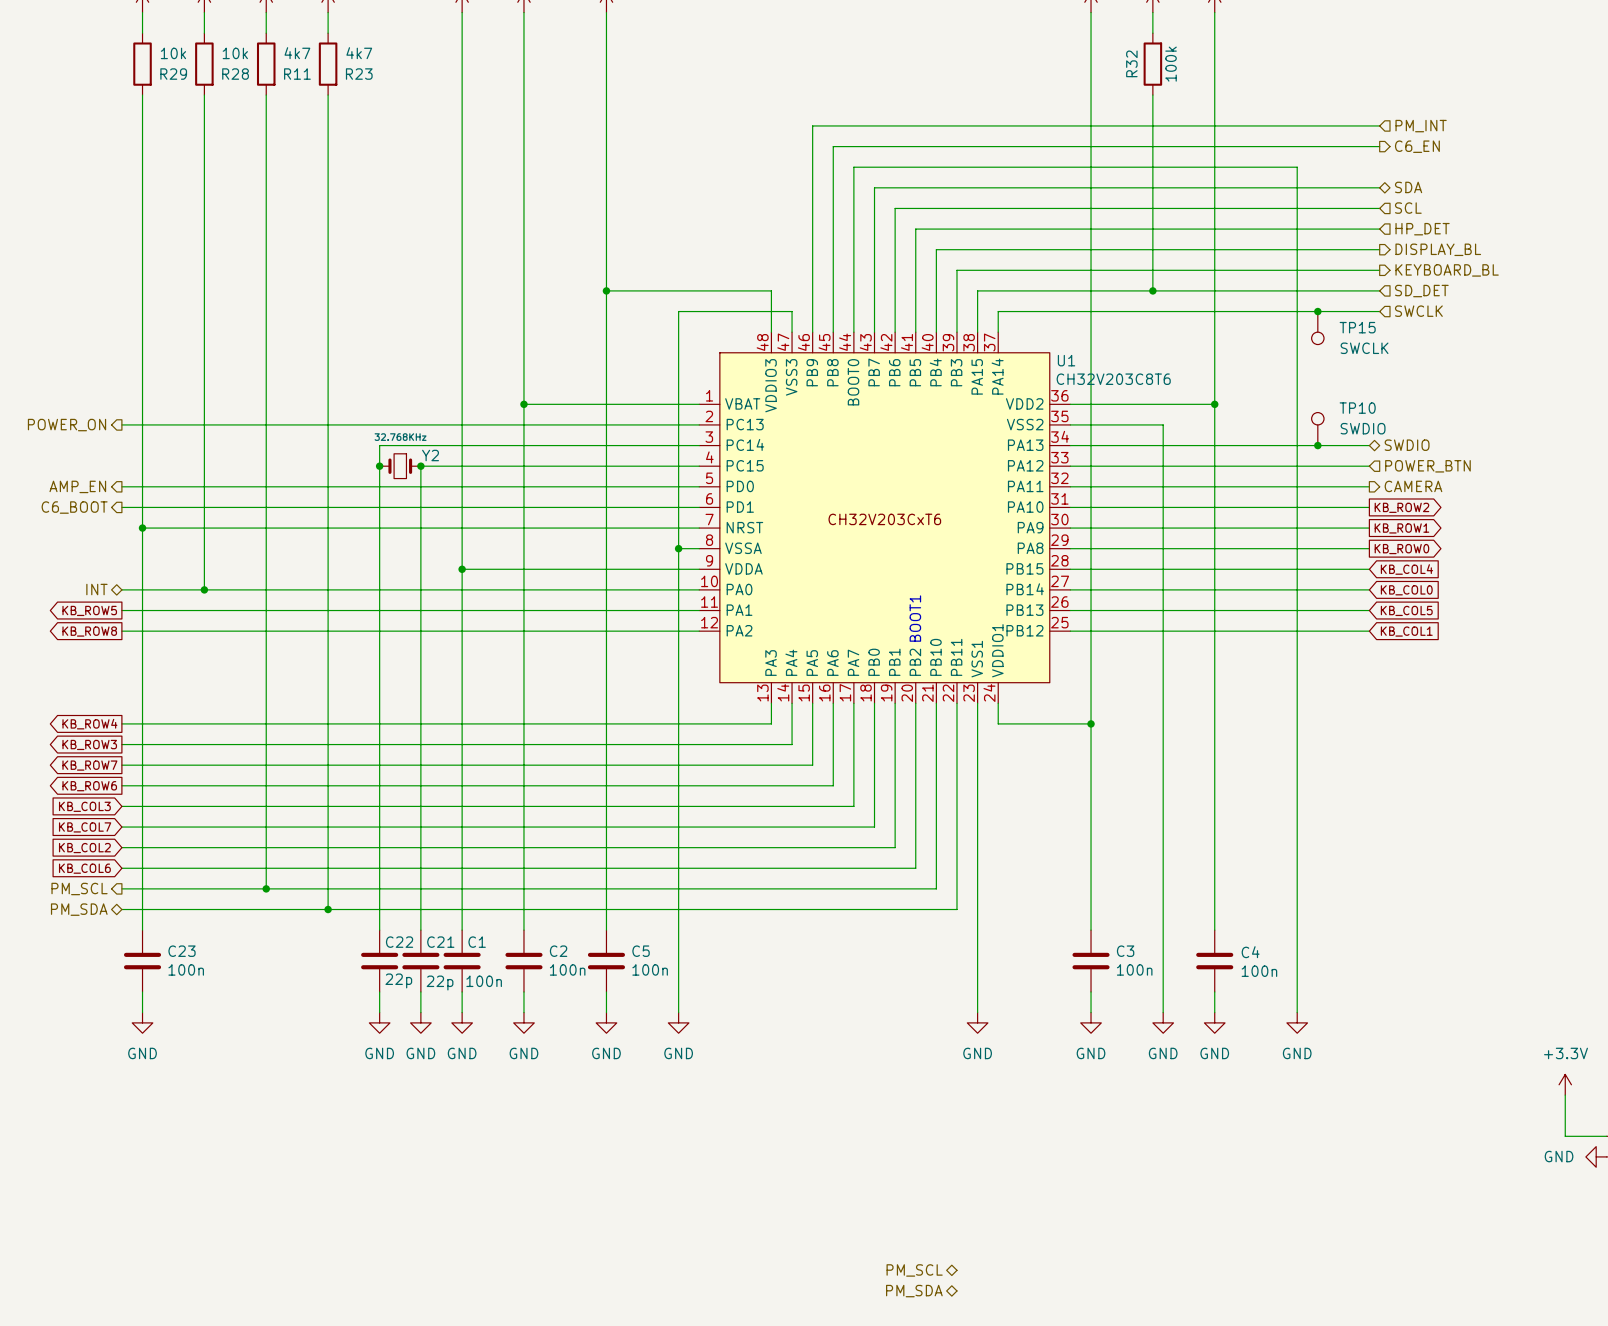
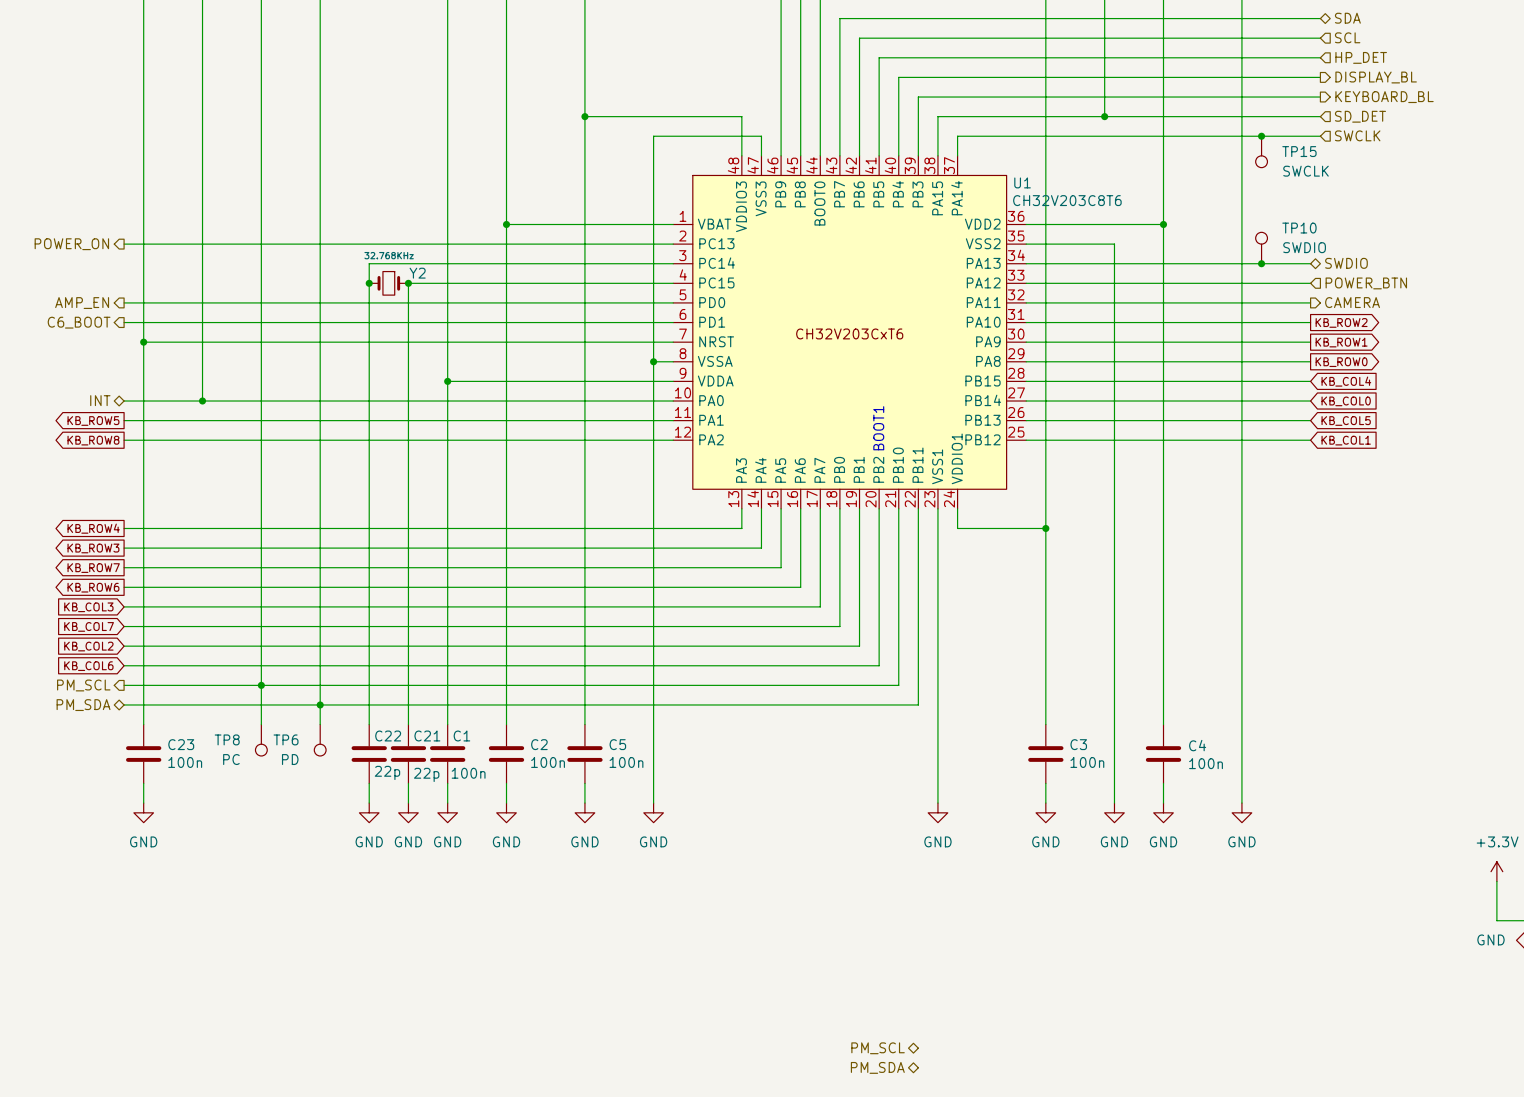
wire: none -> (261, 685) (261, 724)
wire: none -> (320, 704) (320, 724)
TP8: none -> PC (261, 740)
TP6: none -> PD (320, 740)

